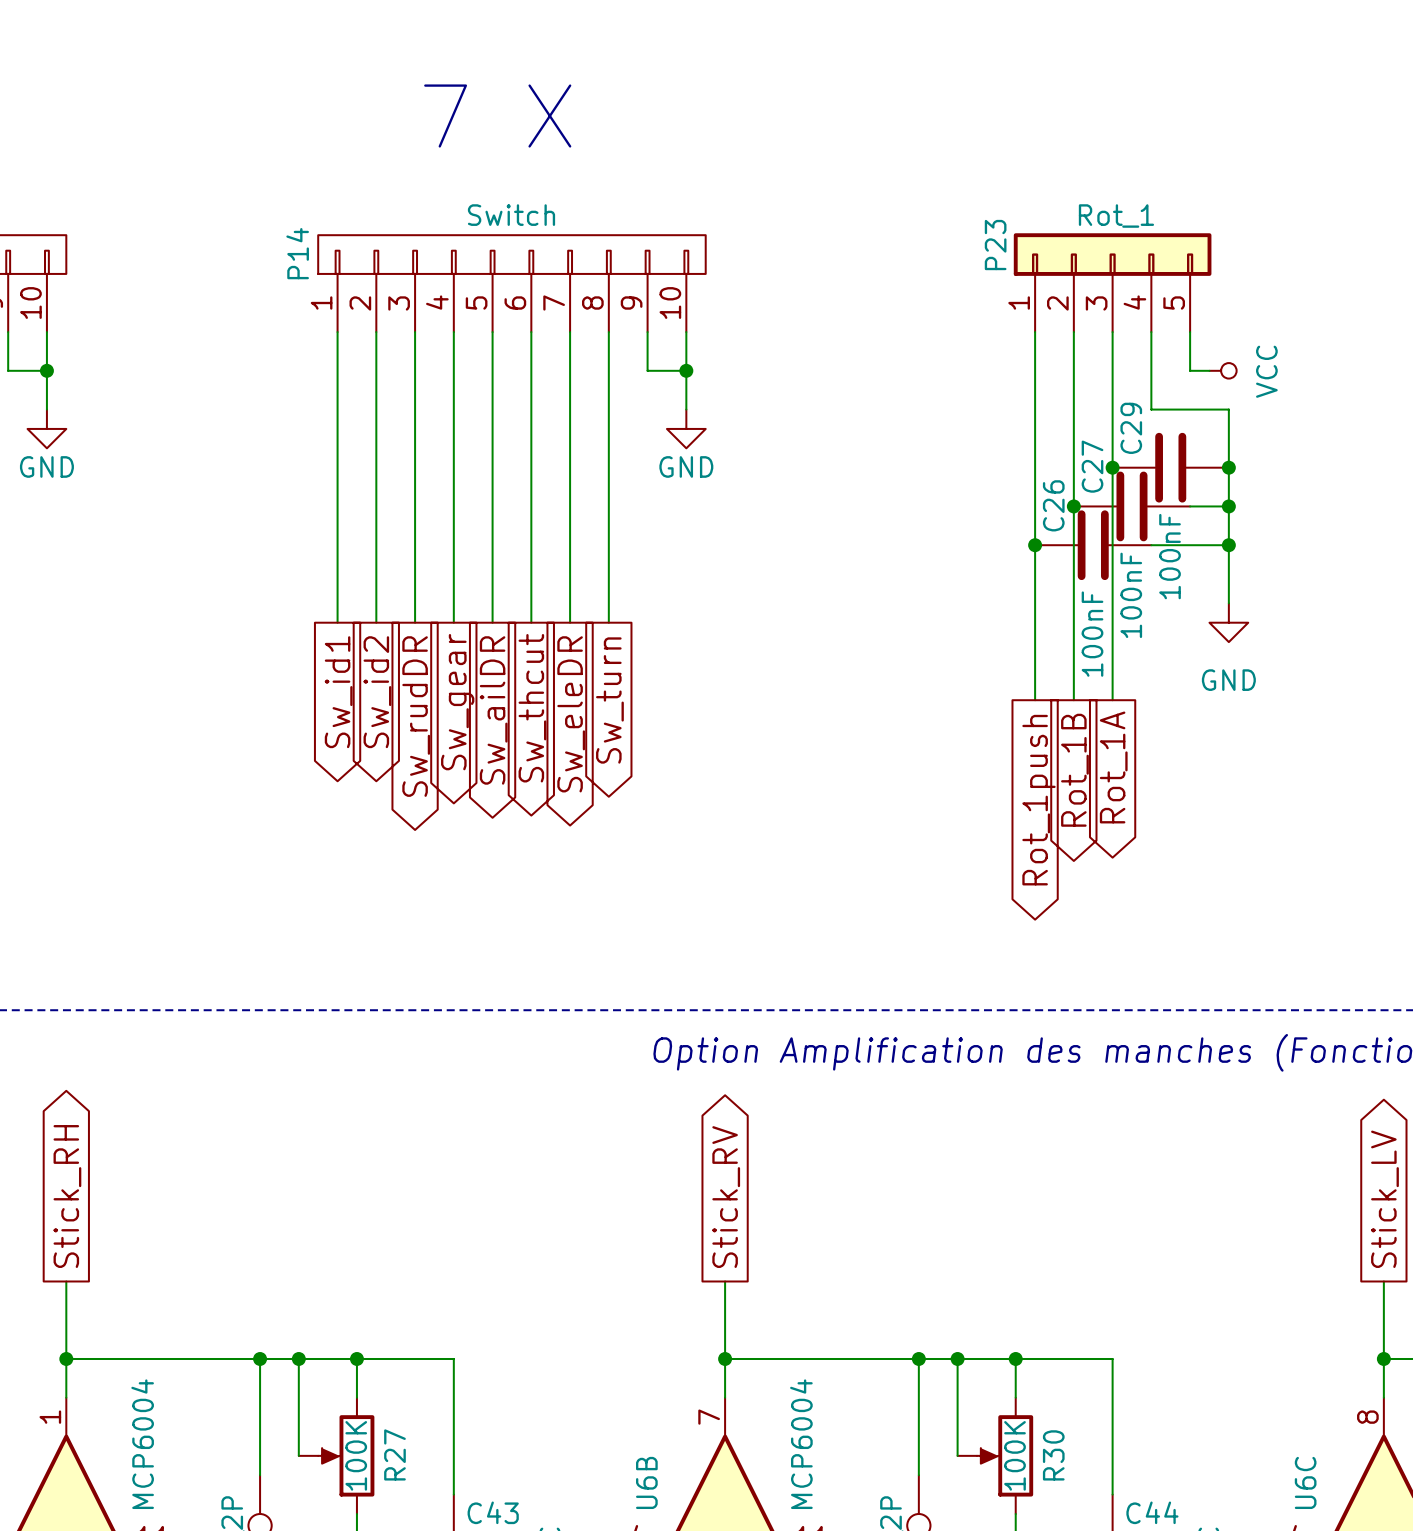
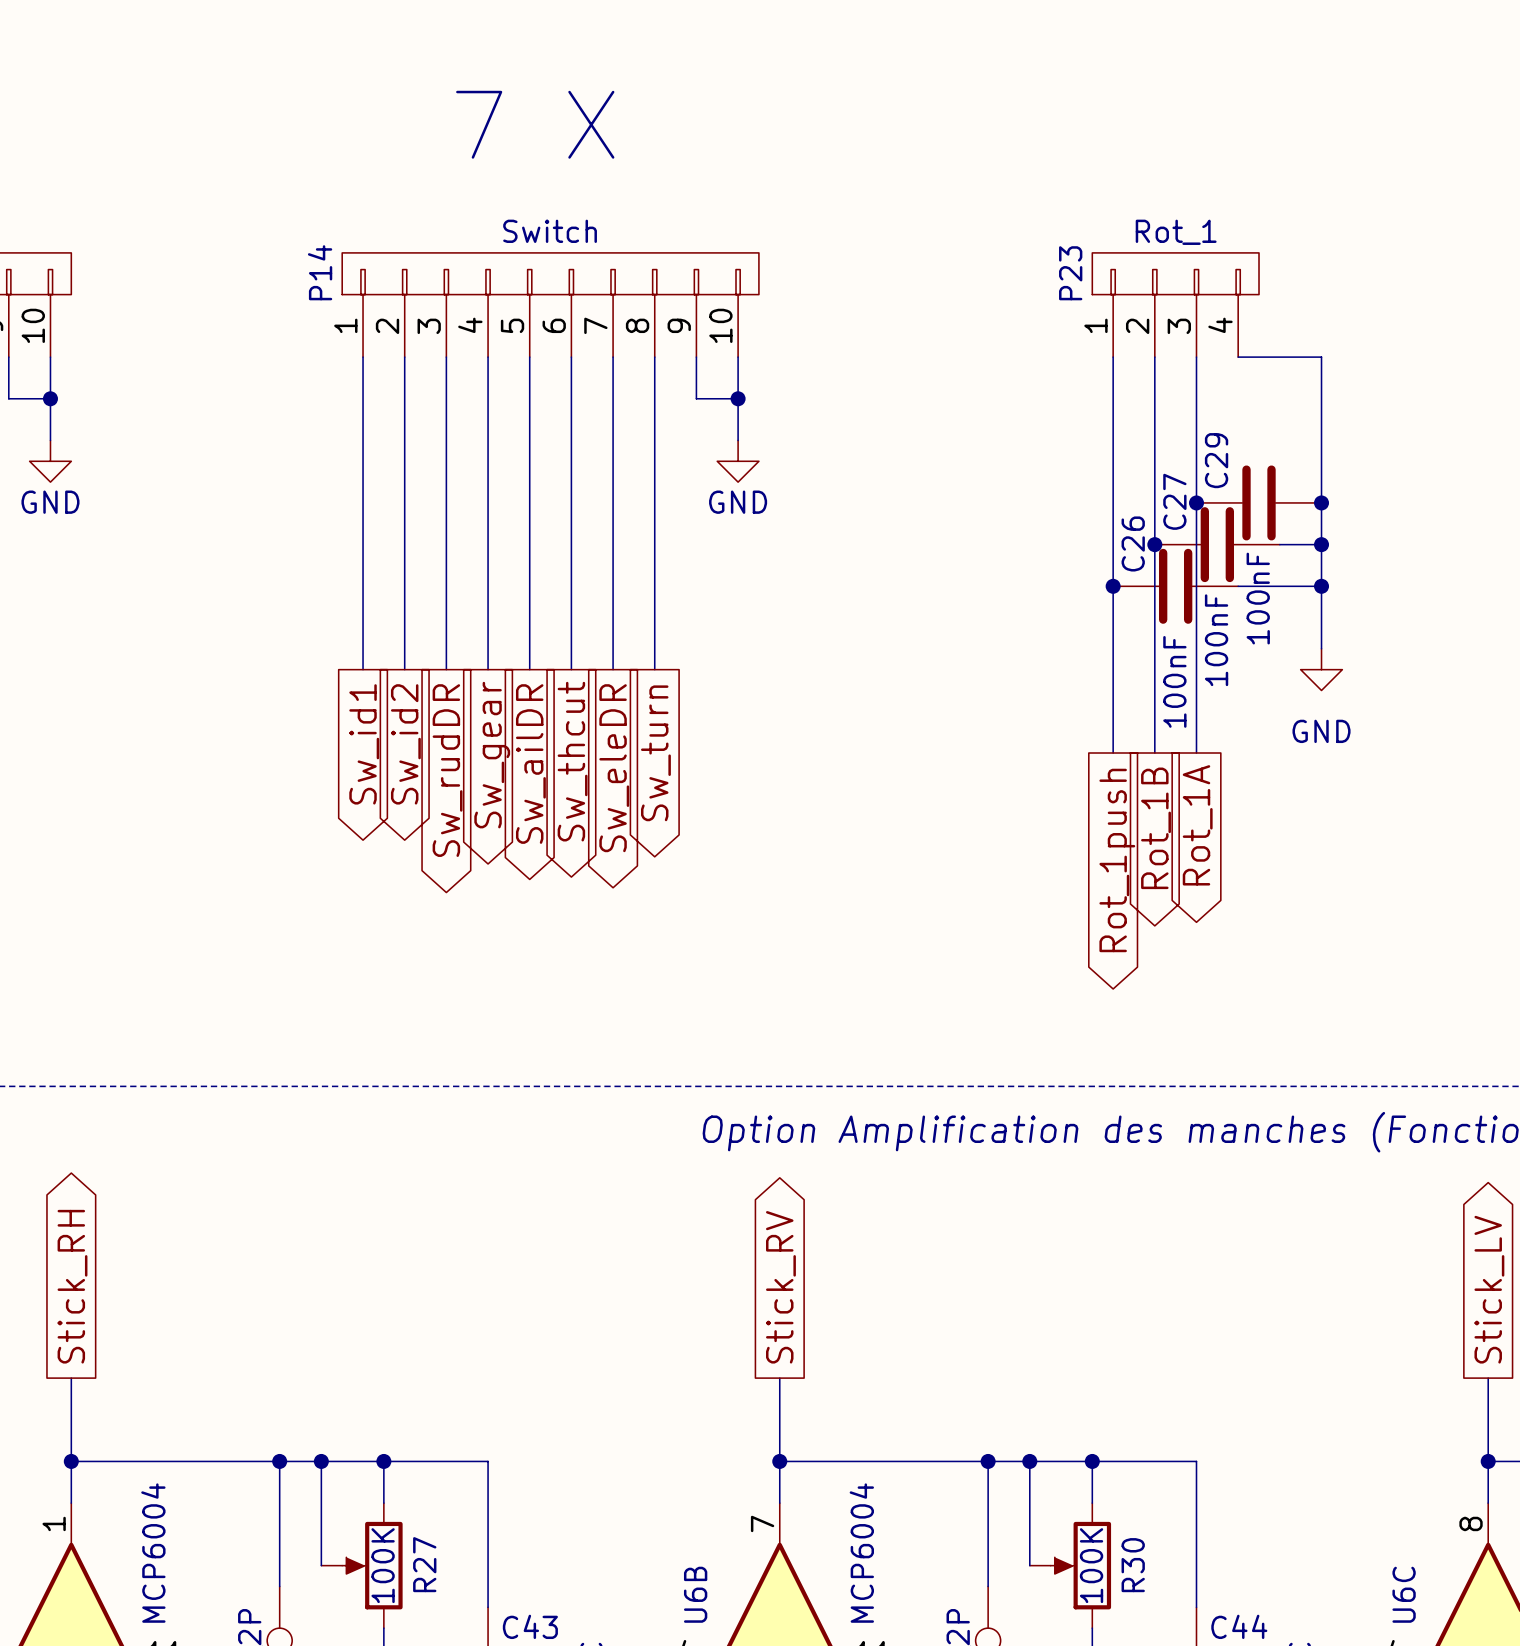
P23 symbol: [1013, 233, 1212, 333] -> [1092, 252, 1260, 358]
wire: (1151, 332) (1151, 409) (1228, 409) -> (1238, 357) (1321, 357) (1321, 440)
wire: (1190, 332) (1190, 370) (1209, 370) -> none
power symbol: VCC (1223, 370) -> none

